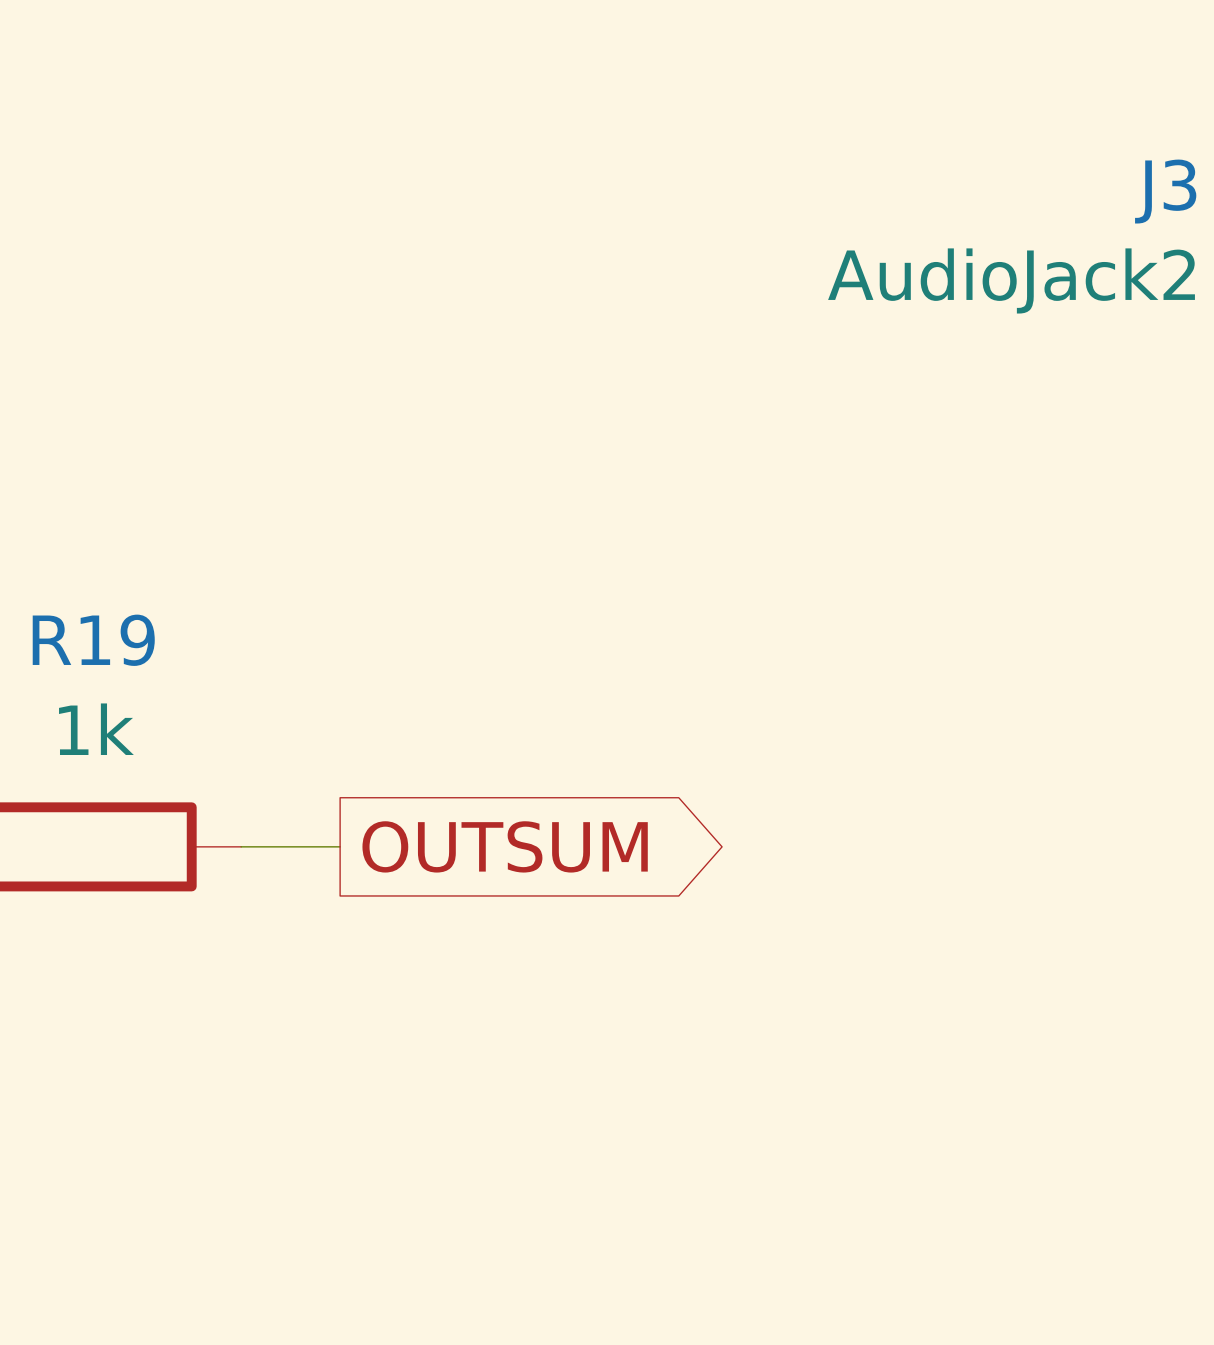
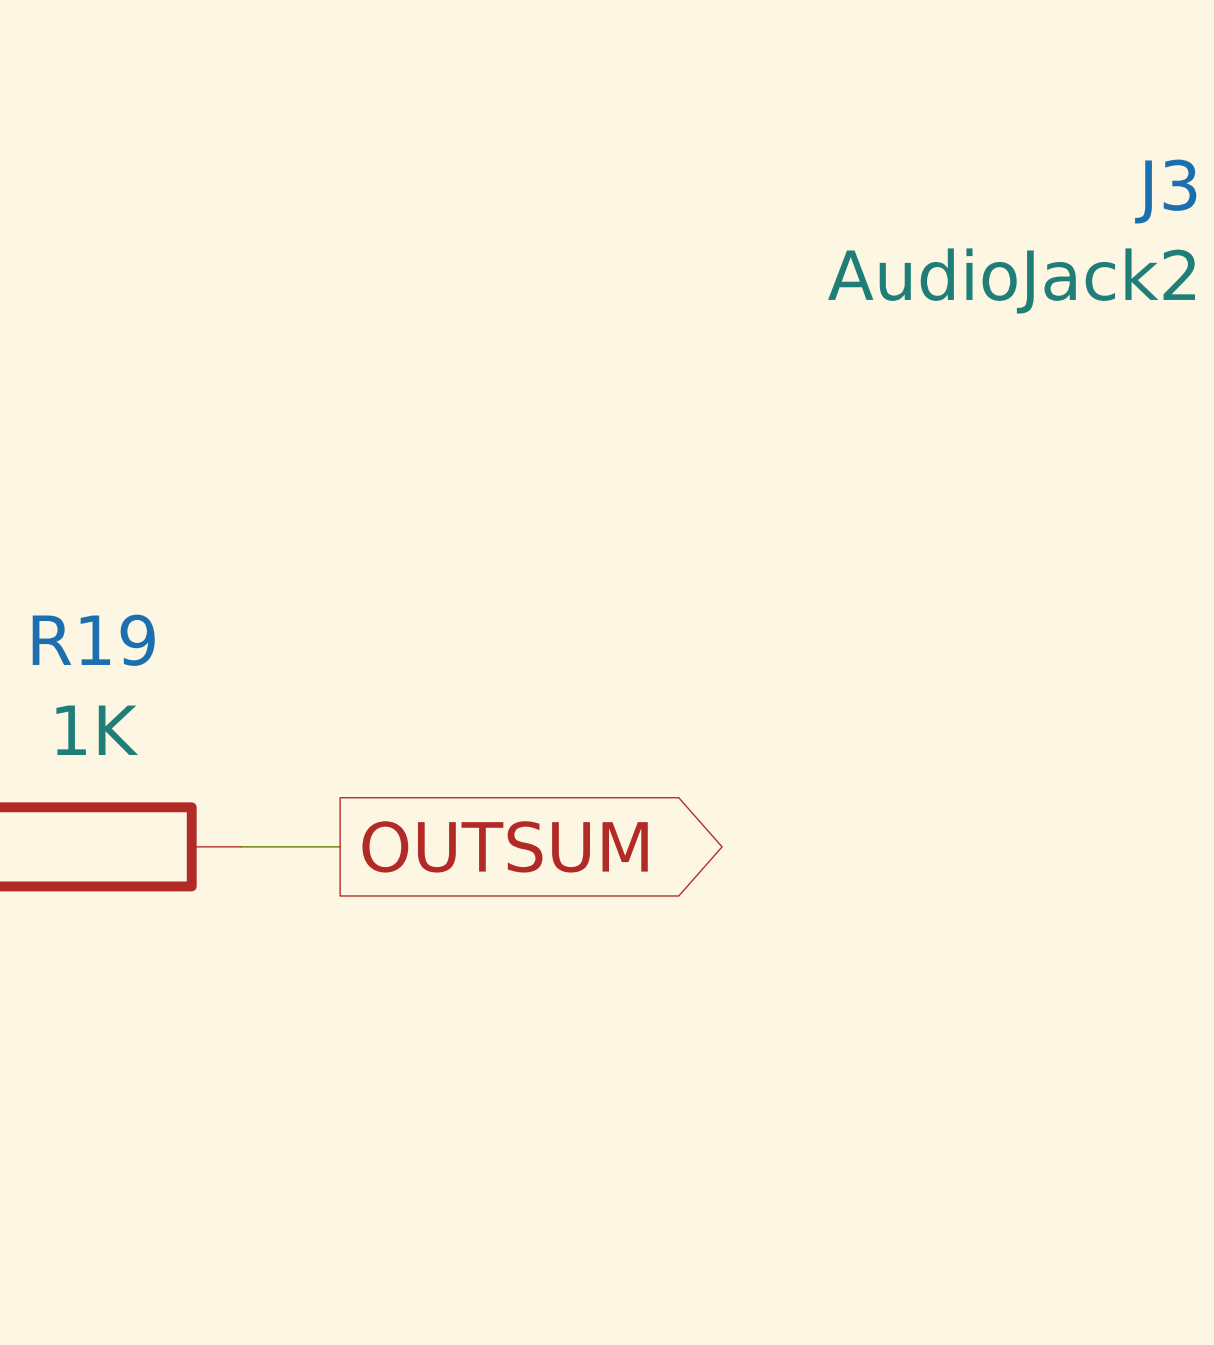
R19 value: 1k (96, 729) -> 1K (97, 730)

